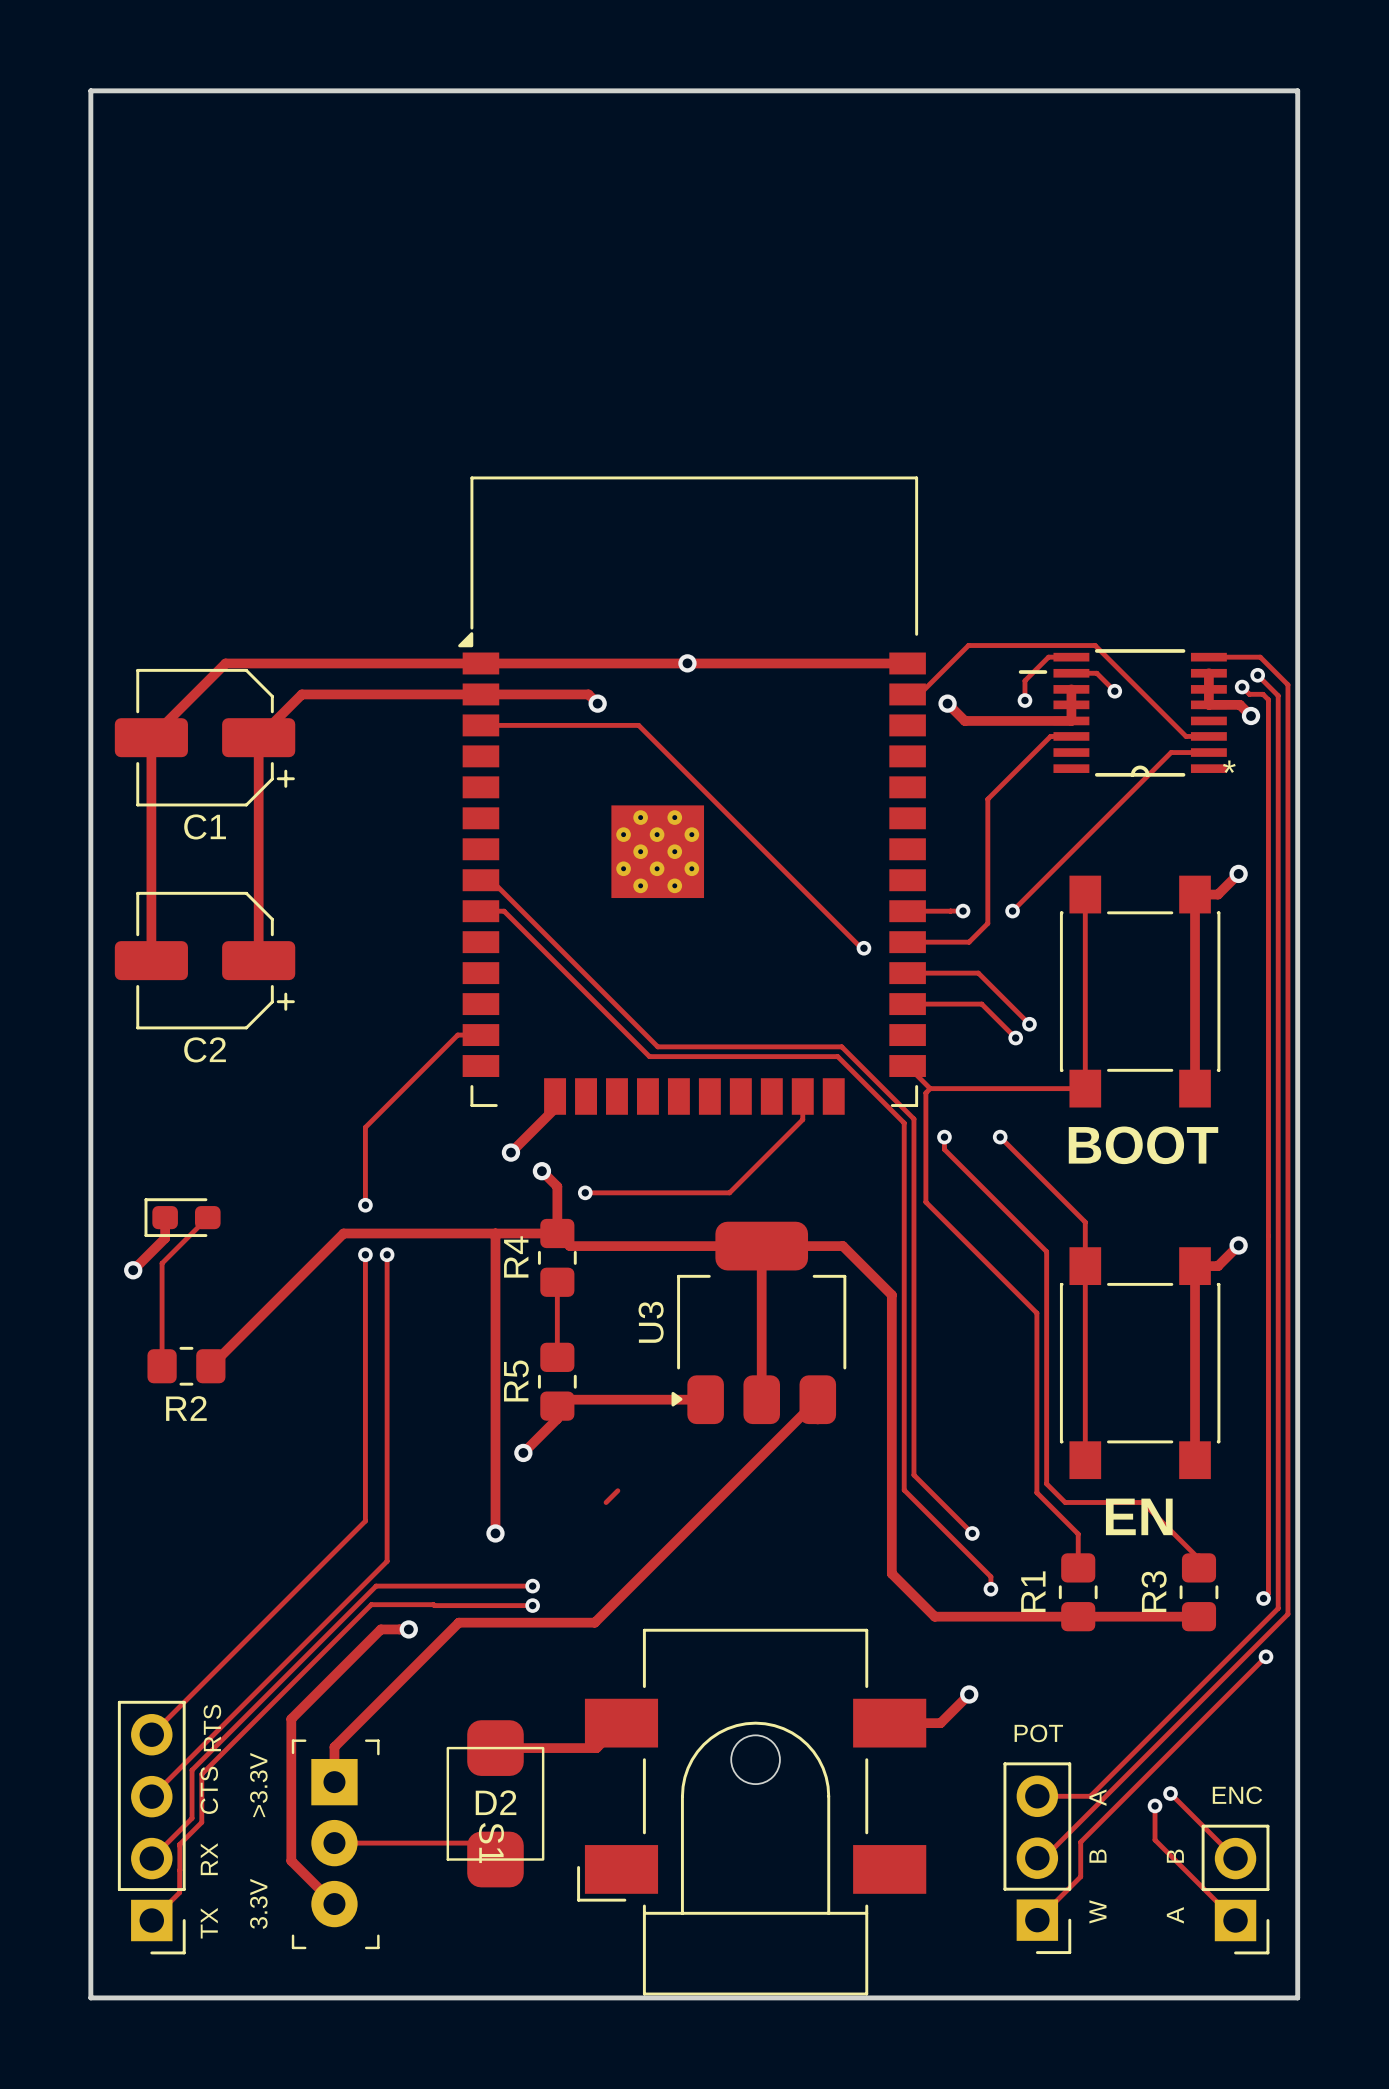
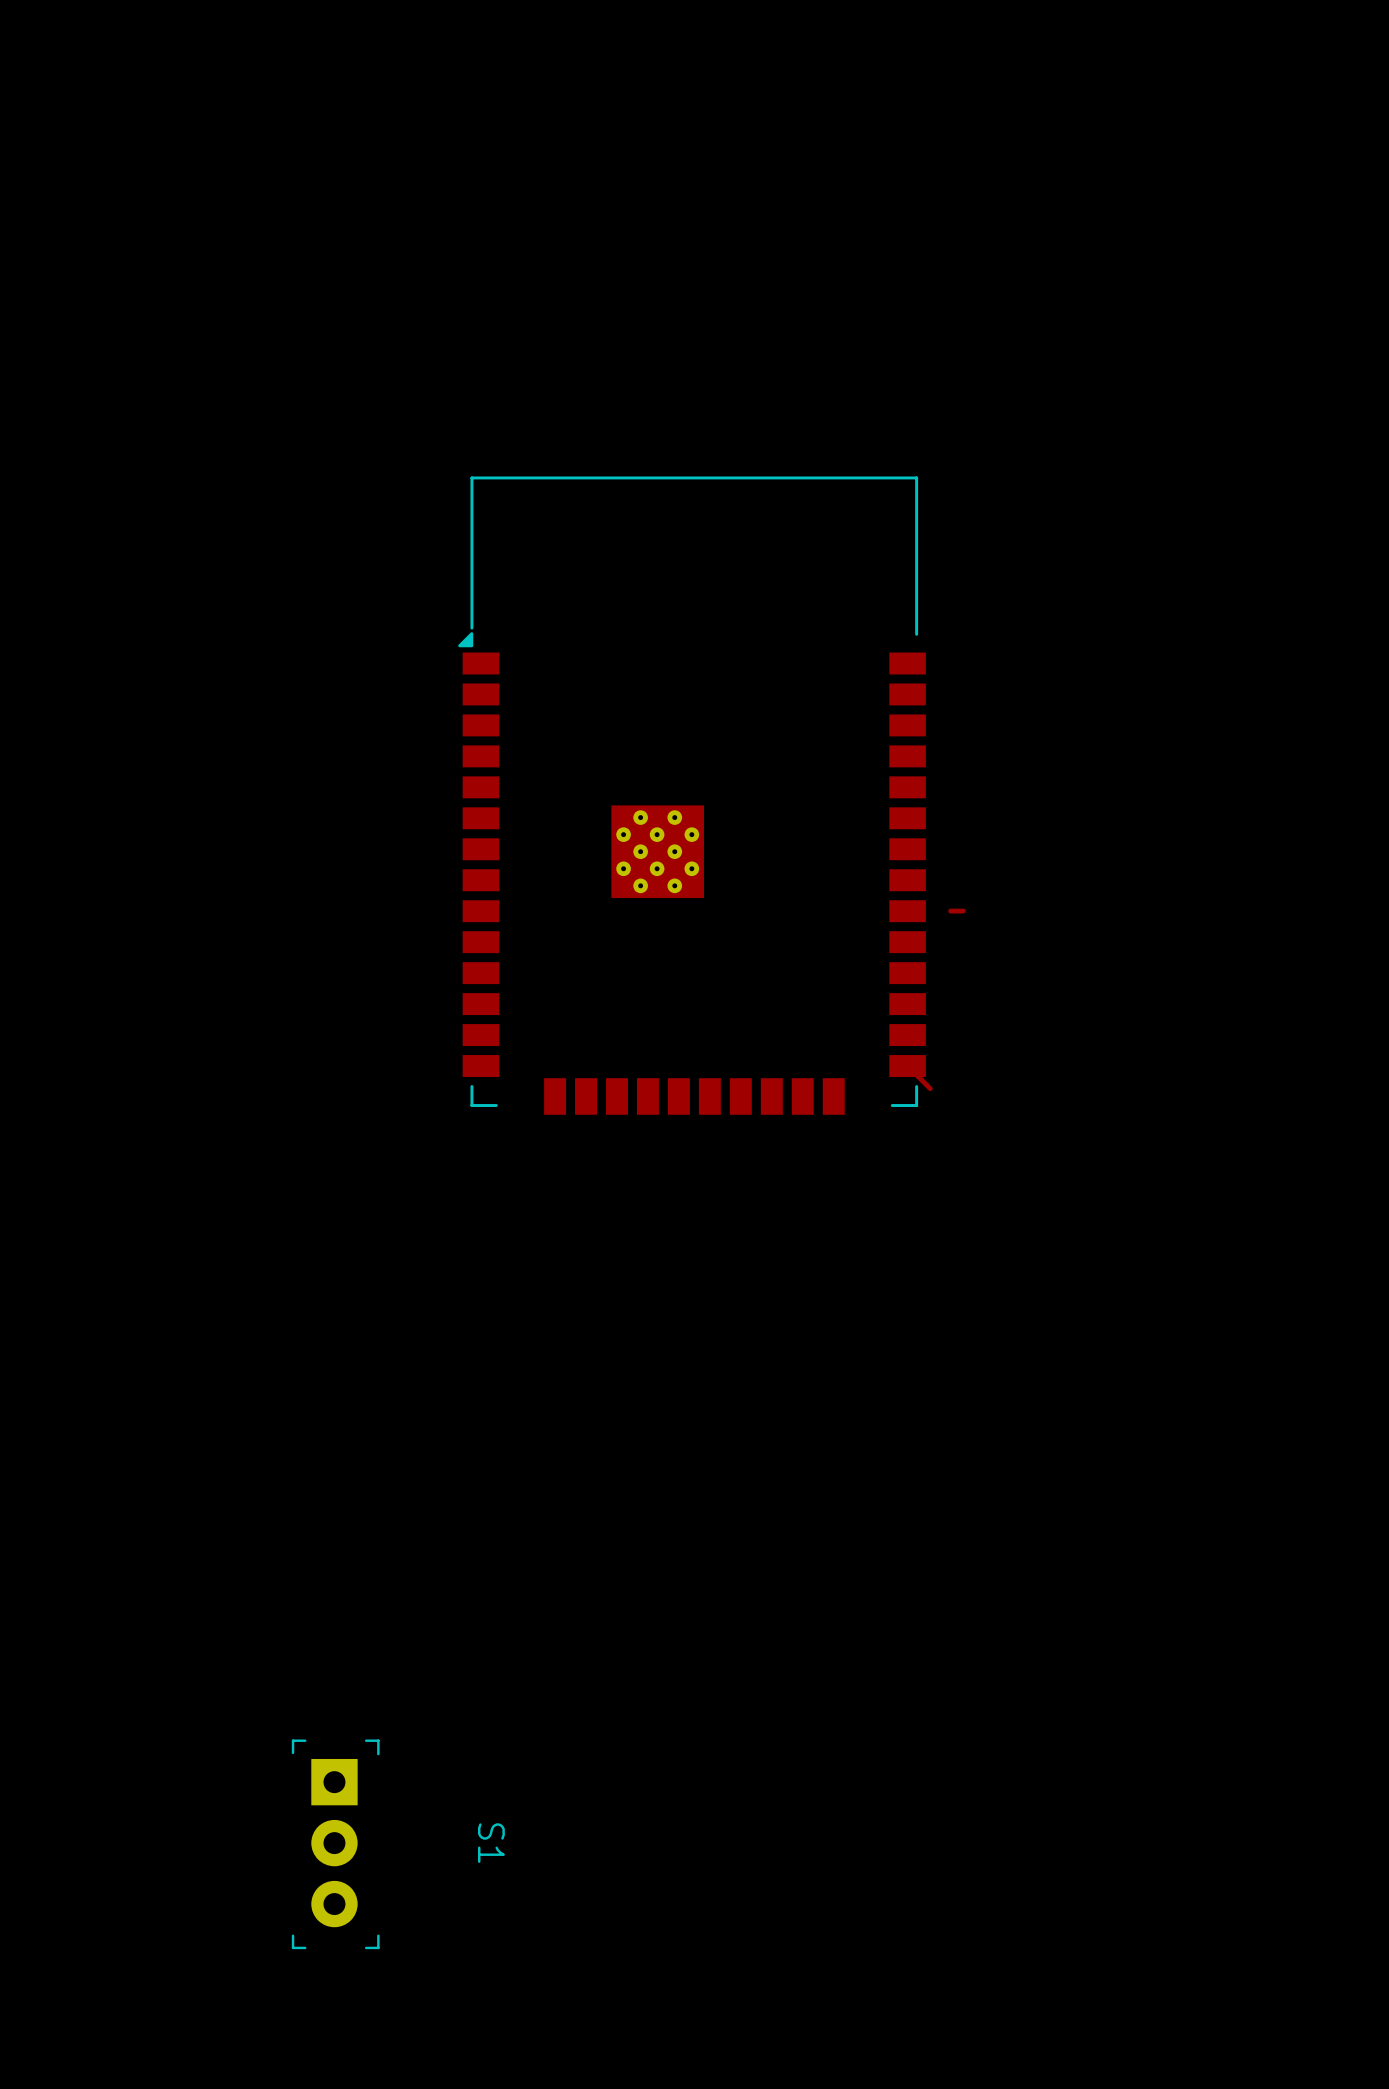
board edge: (90, 90) (1297, 90) (1297, 1997) (90, 1997) (90, 90) -> none
track: (1071, 657) (1048, 657) (1024, 680) (1024, 700) -> none
track: (1208, 657) (1260, 657) (1287, 684) (1287, 1614) (1043, 1858) (1037, 1858) -> none
via: (687, 663) -> none
track: (907, 663) (225, 663) (151, 737) (151, 960) -> none
track: (1071, 673) (1096, 673) (1114, 691) -> none
track: (1208, 673) (1208, 704) (1239, 704) (1251, 716) -> none
track: (1257, 675) (1278, 695) (1278, 1608) (1090, 1796) (1037, 1796) -> none
via: (1257, 675) -> none
track: (1242, 687) (1249, 694) (1262, 694) (1268, 699) (1268, 1593) (1263, 1598) -> none
via: (1242, 687) -> none
track: (1071, 689) (1071, 720) (964, 720) (947, 703) -> none
via: (1114, 691) -> none
track: (907, 694) (919, 694) (968, 645) (1095, 645) (1186, 736) (1208, 736) -> none
via: (1024, 700) -> none
track: (597, 703) (588, 694) (301, 694) (258, 737) (258, 960) -> none
via: (597, 703) -> none
via: (947, 703) -> none
part: (1122, 712) -> none
via: (1251, 716) -> none
track: (480, 725) (638, 725) (861, 948) (863, 948) -> none
track: (1071, 736) (1050, 736) (987, 799) (987, 923) (969, 942) (907, 942) -> none
C1: (205, 737) -> none
track: (1208, 752) (1171, 752) (1012, 911) -> none
track: (1238, 873) (1218, 894) (1195, 894) (1195, 1088) -> none
via: (1238, 873) -> none
track: (480, 880) (491, 880) (657, 1046) (841, 1046) (913, 1119) (913, 1475) (972, 1533) -> none
track: (1085, 894) (1085, 1088) (930, 1088) (925, 1092) (925, 1202) (1036, 1313) (1036, 1492) (1078, 1534) (1078, 1567) -> none
track: (480, 911) (504, 911) (649, 1056) (837, 1056) (904, 1123) (904, 1490) (990, 1576) (990, 1589) -> none
track: (907, 911) (950, 911) -> none
via: (963, 911) -> none
via: (1012, 911) -> none
via: (863, 948) -> none
C2: (205, 960) -> none
track: (907, 973) (978, 973) (1029, 1024) -> none
part: (1140, 991) -> none
track: (907, 1004) (981, 1004) (1015, 1038) -> none
via: (1029, 1024) -> none
track: (480, 1035) (457, 1035) (365, 1127) (365, 1205) -> none
via: (1015, 1038) -> none
track: (555, 1096) (555, 1108) (510, 1152) -> none
track: (802, 1096) (802, 1119) (729, 1192) (585, 1192) -> none
track: (944, 1137) (944, 1149) (1046, 1251) (1046, 1483) (1065, 1502) (1142, 1502) (1198, 1558) -> none
via: (944, 1137) -> none
track: (1000, 1137) (1085, 1222) (1085, 1460) -> none
via: (1000, 1137) -> none
text: BOOT (1143, 1145) -> none
via: (510, 1152) -> none
track: (541, 1171) (557, 1186) (557, 1233) -> none
via: (541, 1171) -> none
via: (585, 1192) -> none
via: (365, 1205) -> none
track: (165, 1217) (165, 1238) (133, 1270) -> none
part: (182, 1217) -> none
track: (207, 1217) (162, 1263) (162, 1366) -> none
track: (495, 1233) (495, 1533) -> none
track: (557, 1233) (343, 1233) (210, 1366) -> none
track: (557, 1233) (569, 1246) (842, 1246) (891, 1295) (891, 1573) (934, 1616) (1198, 1616) -> none
track: (1238, 1245) (1218, 1266) (1195, 1266) (1195, 1460) -> none
via: (1238, 1245) -> none
track: (761, 1246) (761, 1399) -> none
track: (365, 1254) (365, 1521) (151, 1734) -> none
via: (365, 1254) -> none
track: (387, 1254) (387, 1561) (151, 1796) -> none
via: (387, 1254) -> none
R4: (557, 1257) -> none
via: (133, 1270) -> none
track: (557, 1282) (557, 1357) -> none
U3: (758, 1322) -> none
part: (1140, 1363) -> none
R2: (186, 1366) -> none
R5: (557, 1381) -> none
track: (705, 1399) (563, 1399) (557, 1406) (557, 1418) (523, 1452) -> none
track: (817, 1419) (817, 1399) (594, 1622) (458, 1622) (334, 1747) (334, 1782) -> none
via: (523, 1452) -> none
track: (617, 1490) (606, 1502) -> none
text: EN (1139, 1516) -> none
via: (495, 1533) -> none
via: (972, 1533) -> none
track: (532, 1586) (376, 1586) (192, 1770) (192, 1818) (151, 1858) -> none
via: (532, 1586) -> none
via: (990, 1589) -> none
R1: (1078, 1592) -> none
R3: (1198, 1592) -> none
via: (1263, 1598) -> none
track: (532, 1605) (371, 1604) (201, 1774) (201, 1822) (179, 1844) (179, 1892) (151, 1920) -> none
via: (532, 1605) -> none
track: (408, 1629) (380, 1629) (291, 1719) (291, 1860) (334, 1904) -> none
via: (408, 1629) -> none
track: (1266, 1656) (1080, 1842) (1080, 1876) (1037, 1920) -> none
via: (1266, 1656) -> none
track: (969, 1694) (940, 1723) (889, 1723) -> none
via: (969, 1694) -> none
track: (621, 1723) (596, 1748) (495, 1748) -> none
text: RTS (212, 1728) -> none
text: POT (1038, 1733) -> none
text: >3.3V (258, 1785) -> none
text: CTS (209, 1790) -> none
track: (1170, 1793) (1235, 1858) -> none
via: (1170, 1793) -> none
text: ENC (1237, 1795) -> none
text: A (1097, 1797) -> none
D2: (495, 1803) -> none
track: (1155, 1805) (1155, 1840) (1235, 1920) -> none
via: (1155, 1805) -> none
part: (751, 1812) -> none
part: (151, 1827) -> none
track: (334, 1843) (479, 1843) (495, 1859) -> none
text: B (1097, 1856) -> none
text: B (1175, 1856) -> none
part: (1037, 1858) -> none
text: RX (209, 1859) -> none
part: (1235, 1889) -> none
text: 3.3V (258, 1903) -> none
text: W (1097, 1911) -> none
text: A (1175, 1915) -> none
text: TX (209, 1923) -> none

